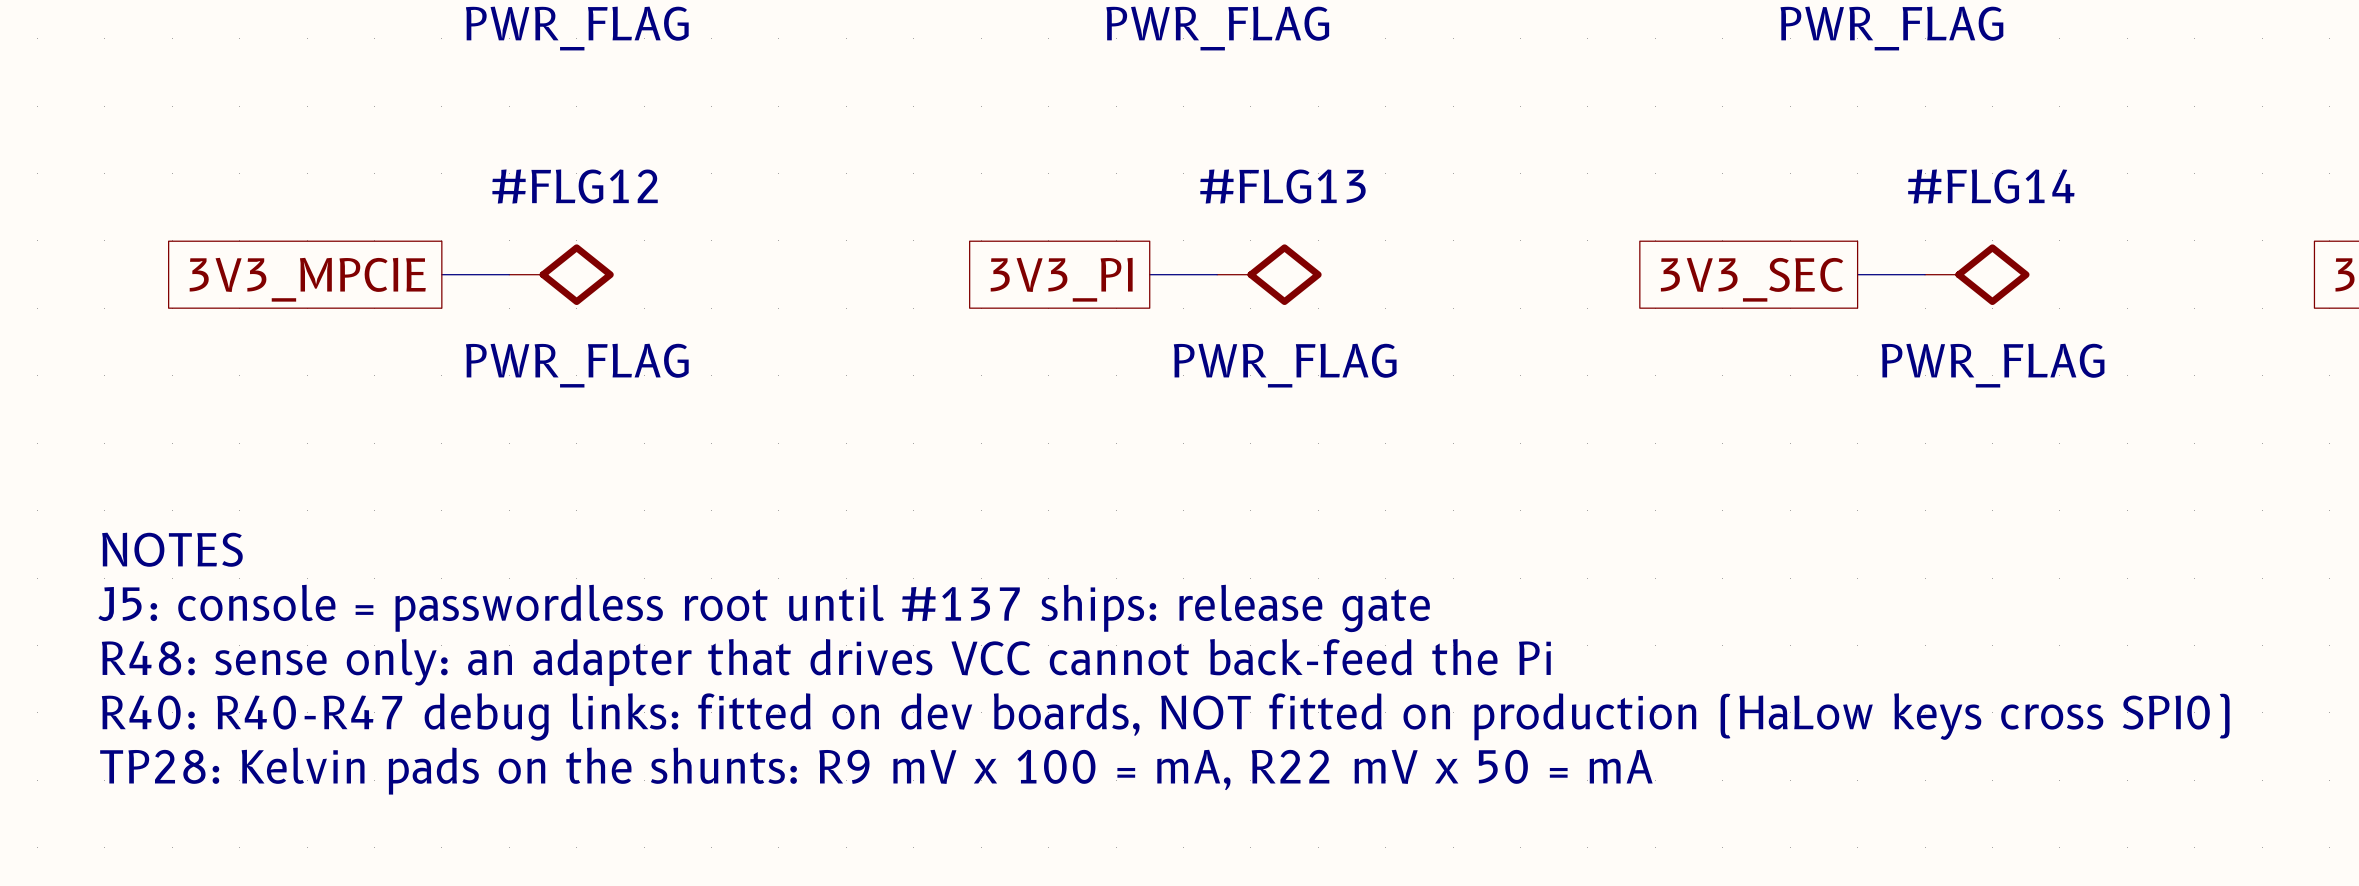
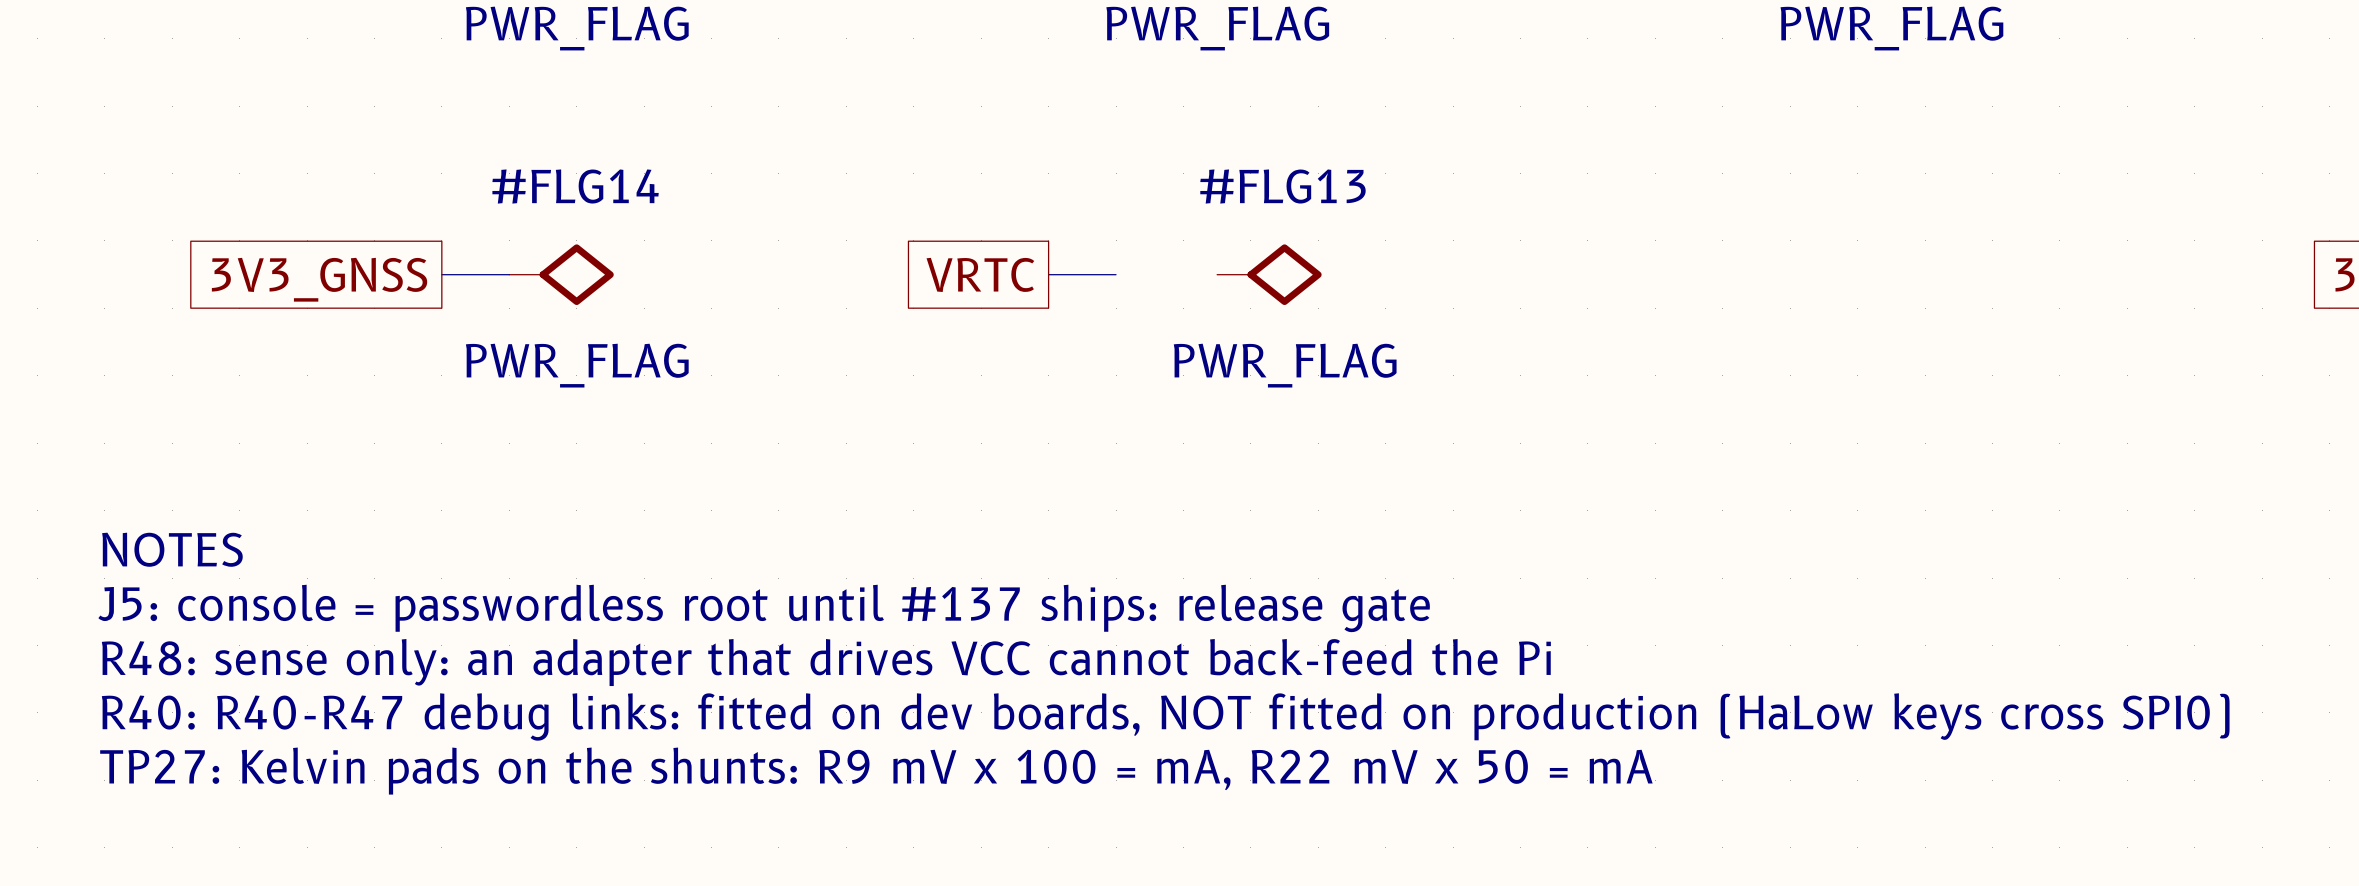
#FLG12 name: #FLG12 (575, 186) -> #FLG14 (575, 186)
global label: none -> VRTC (980, 274)
wire: (1149, 274) (1217, 274) -> (1048, 274) (1116, 274)
wire: (1857, 274) (1925, 274) -> none
#FLG14: PWR_FLAG (1977, 274) -> none
global label: 3V3_MPCIE (307, 279) -> 3V3_GNSS (319, 279)
global label: 3V3_PI (1061, 279) -> none
global label: 3V3_SEC (1752, 279) -> none
text: TP28: Kelvin pads on the shunts: R9 mV x 100 = mA, R22 mV x 50 = mA (876, 771) -> TP27: Kelvin pads on the shunts: R9 mV x 100 = mA, R22 mV x 50 = mA (876, 771)

